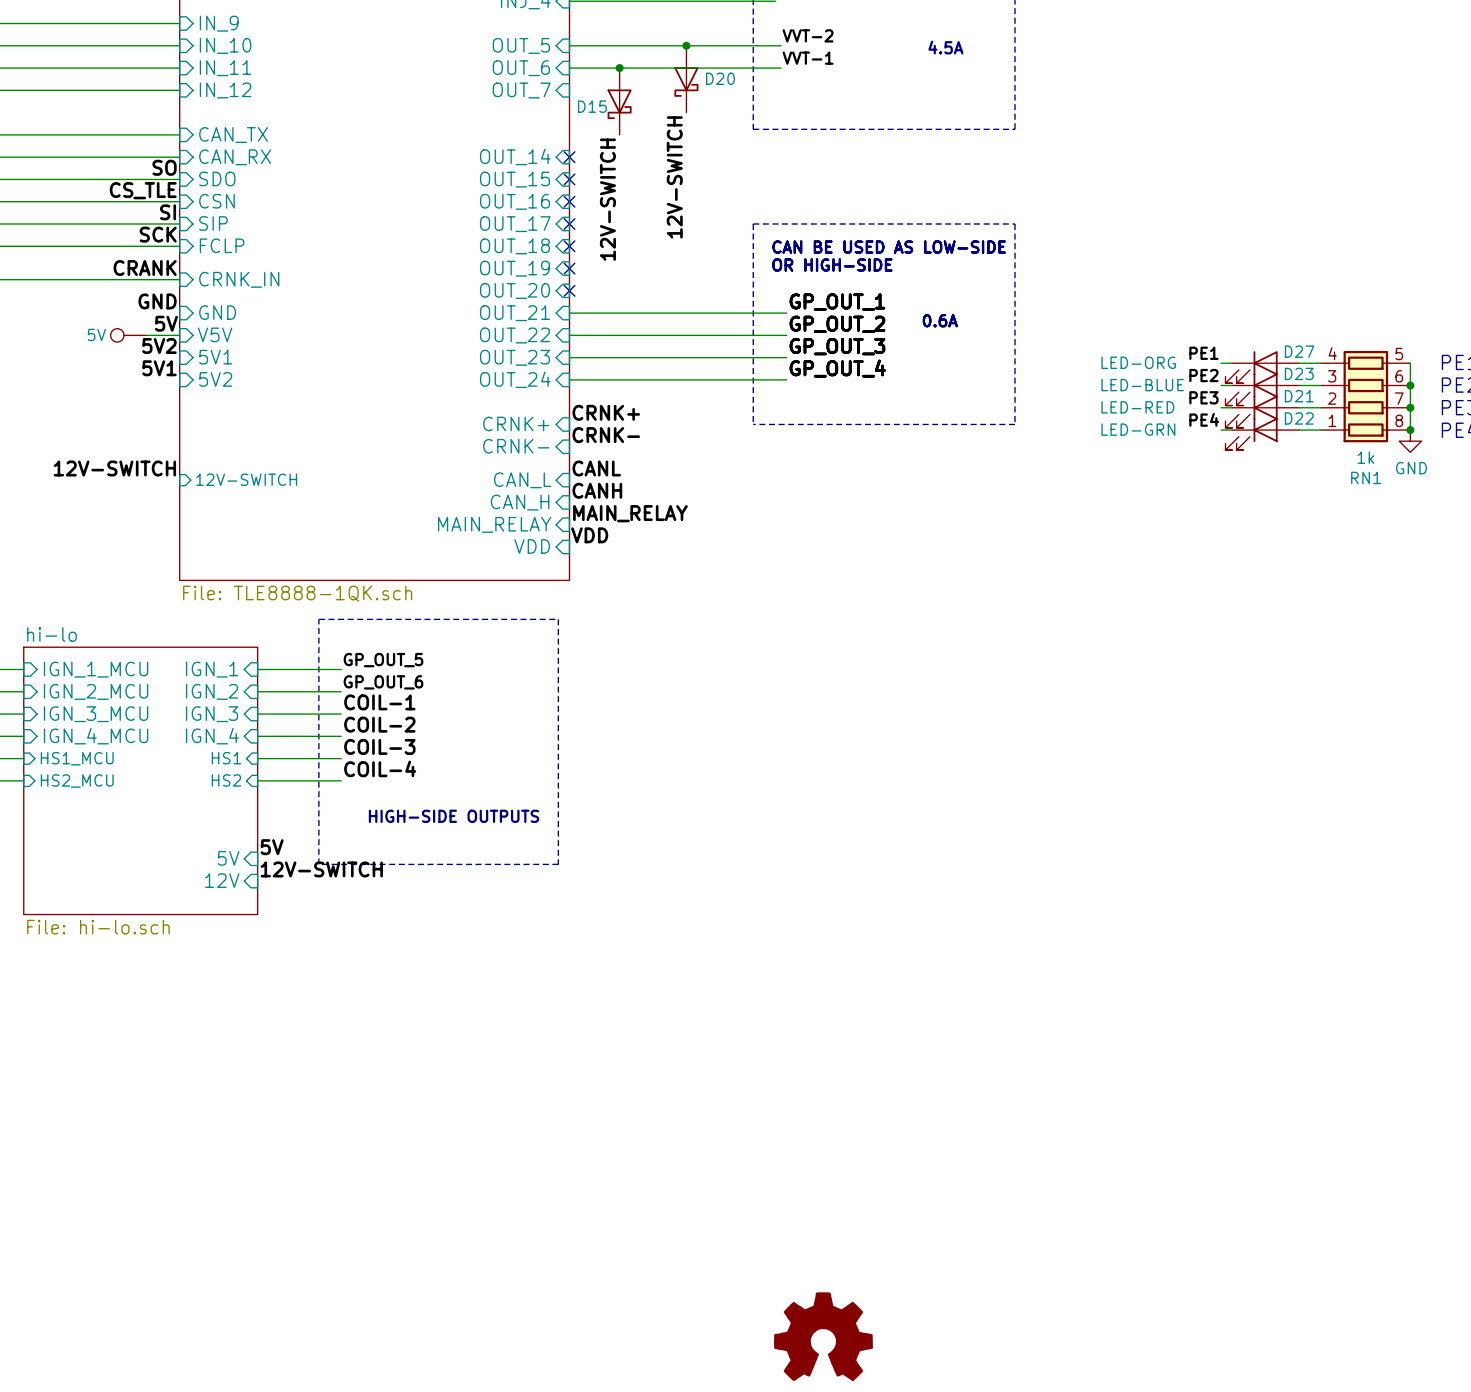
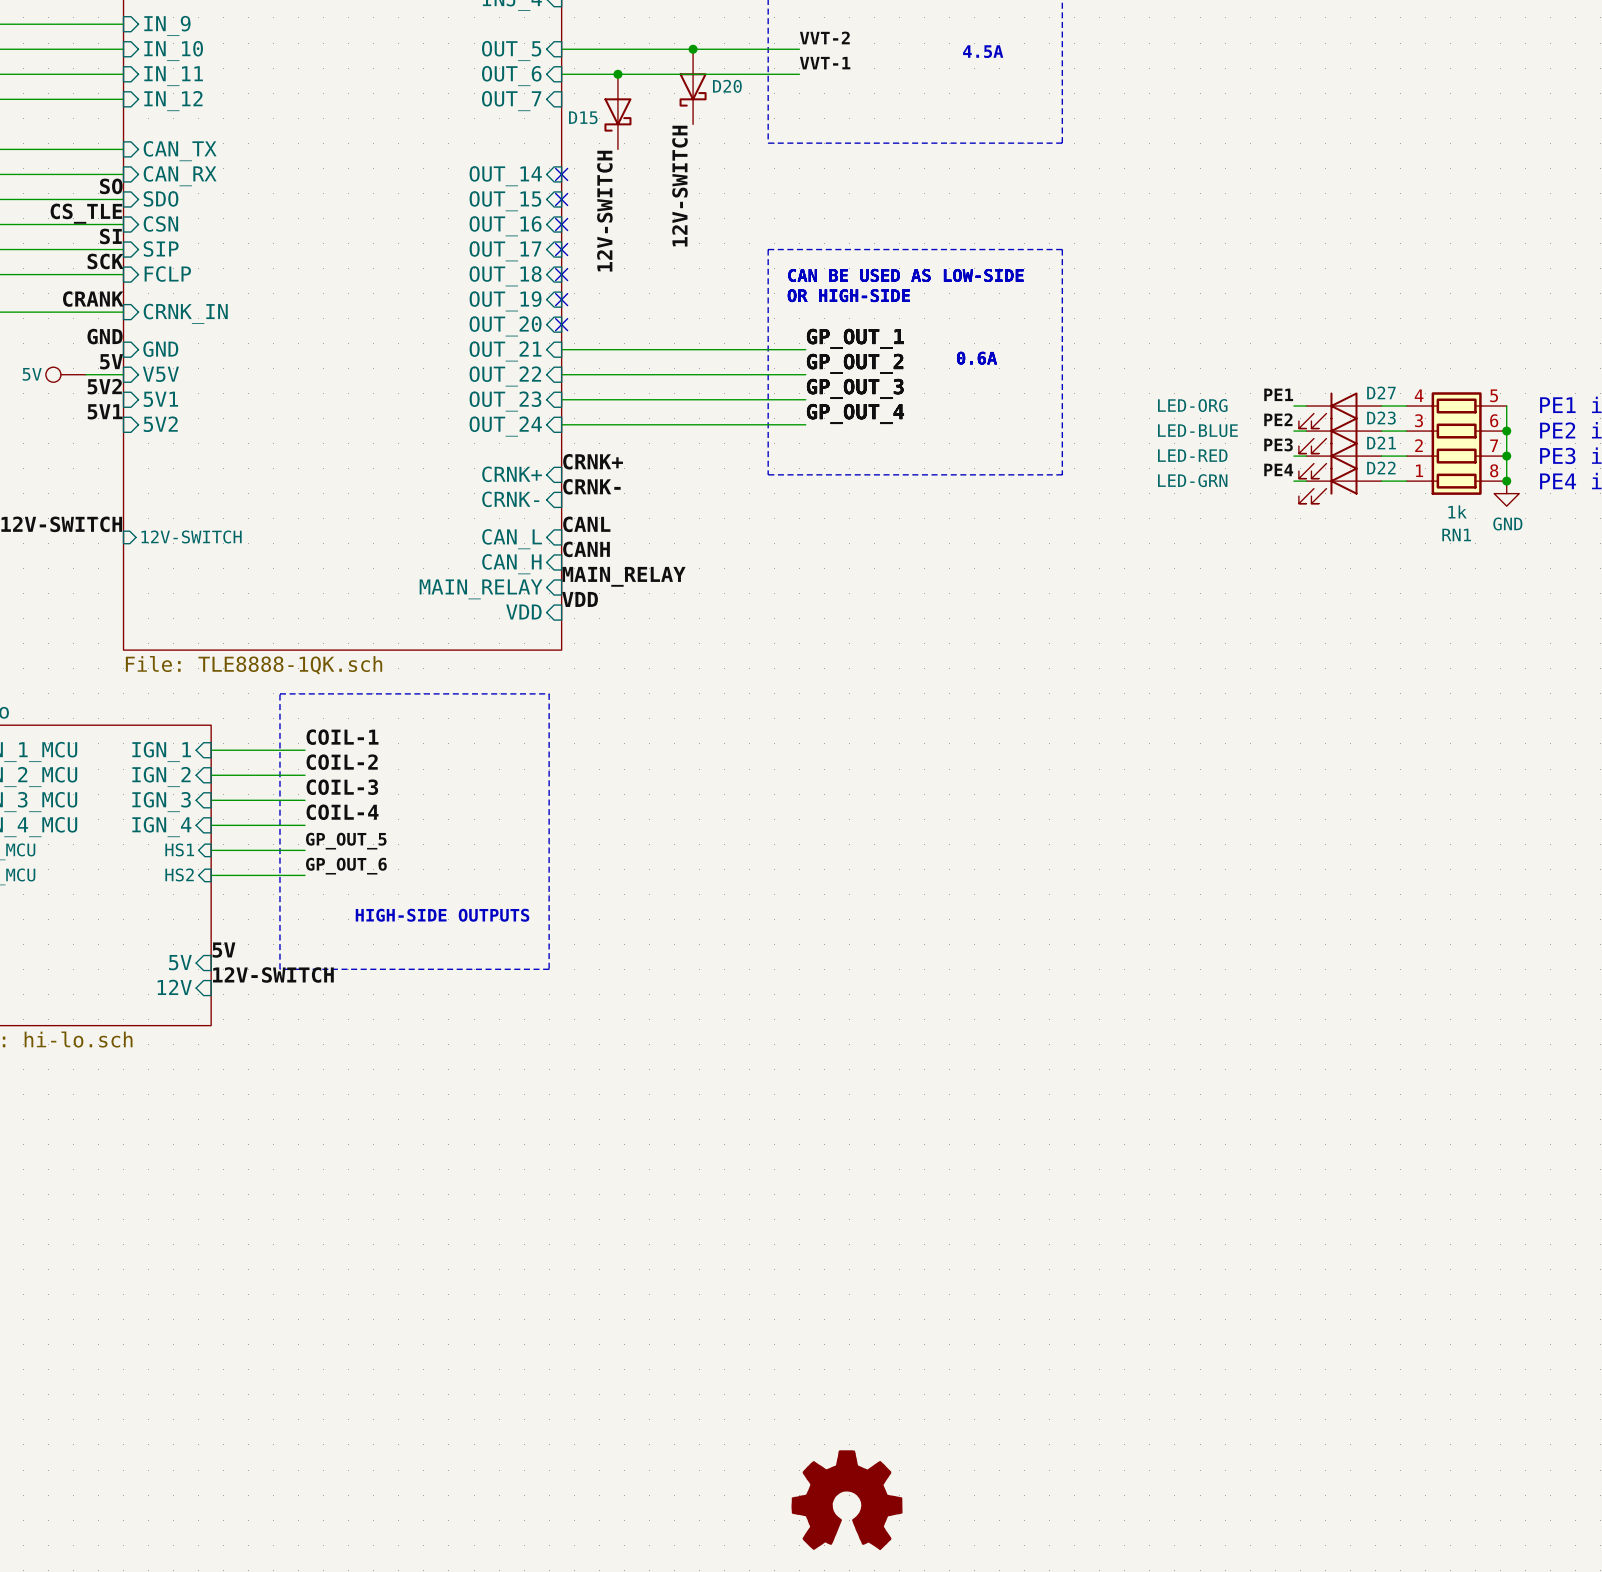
label: GP_OUT_5 (383, 660) -> COIL-1 (342, 737)
label: GP_OUT_6 (383, 682) -> COIL-2 (342, 762)
label: COIL-1 (379, 702) -> COIL-3 (342, 787)
label: COIL-2 (379, 724) -> COIL-4 (342, 812)
label: COIL-3 (379, 746) -> GP_OUT_5 (346, 841)
label: COIL-4 (380, 768) -> GP_OUT_6 (346, 866)

